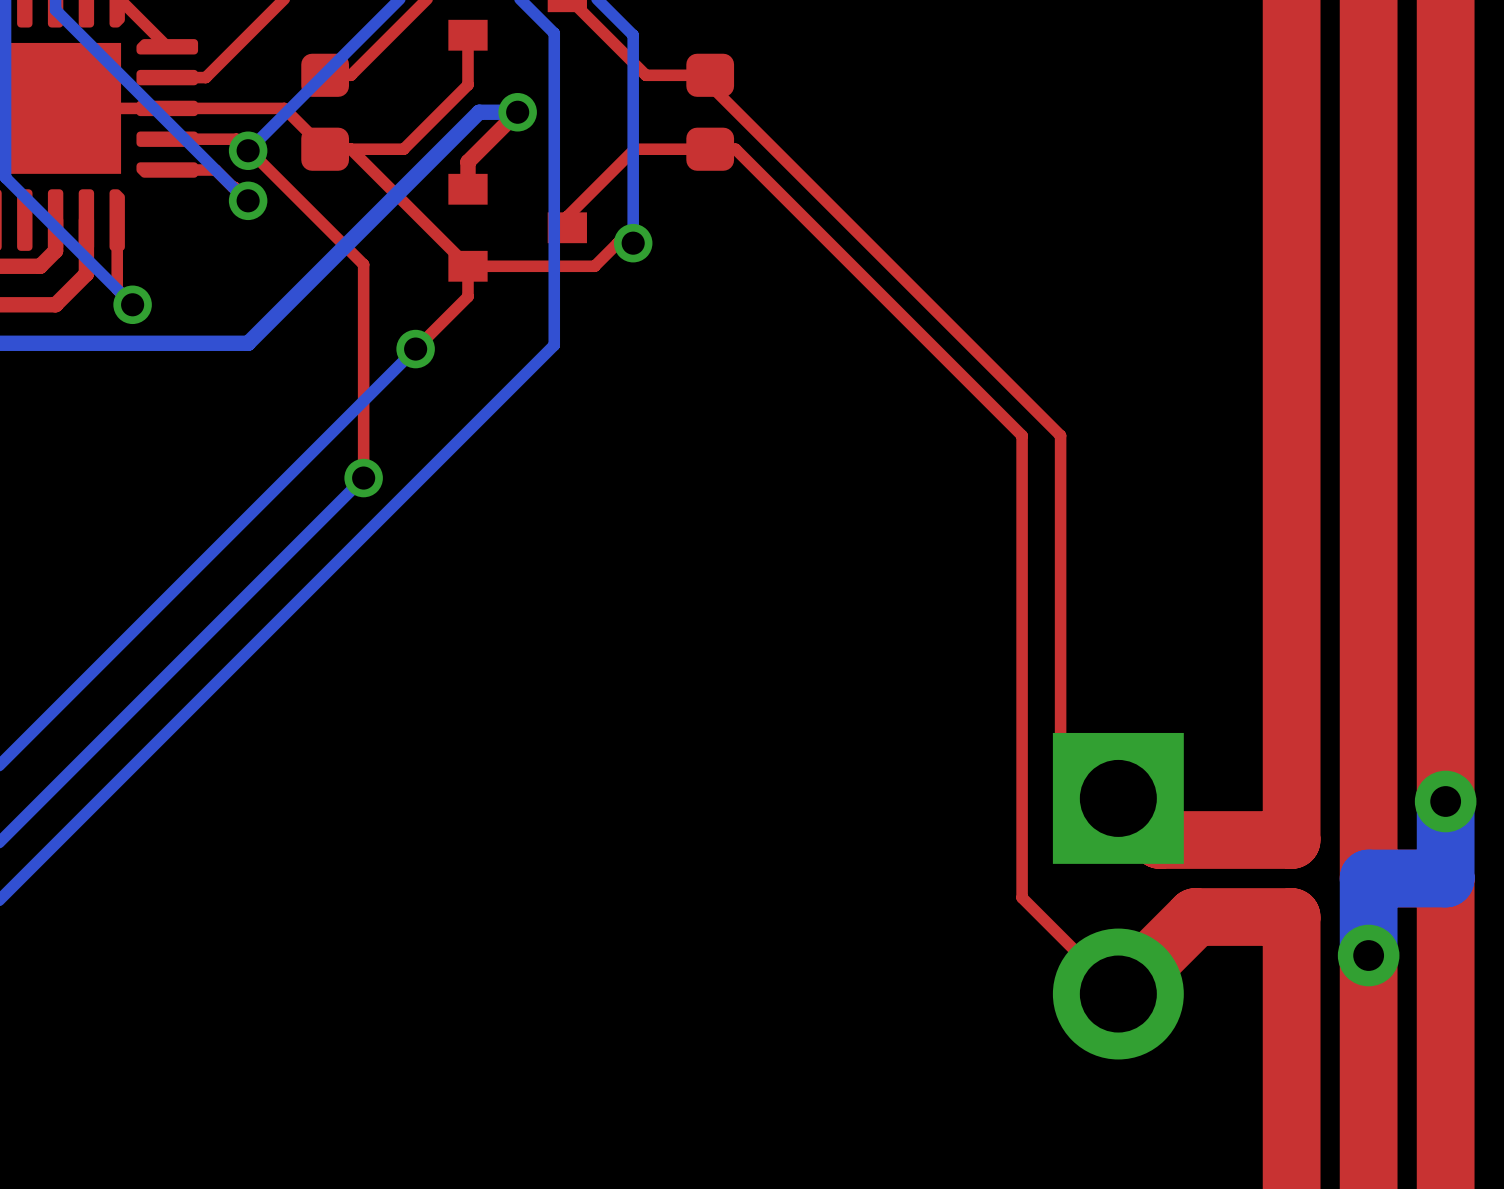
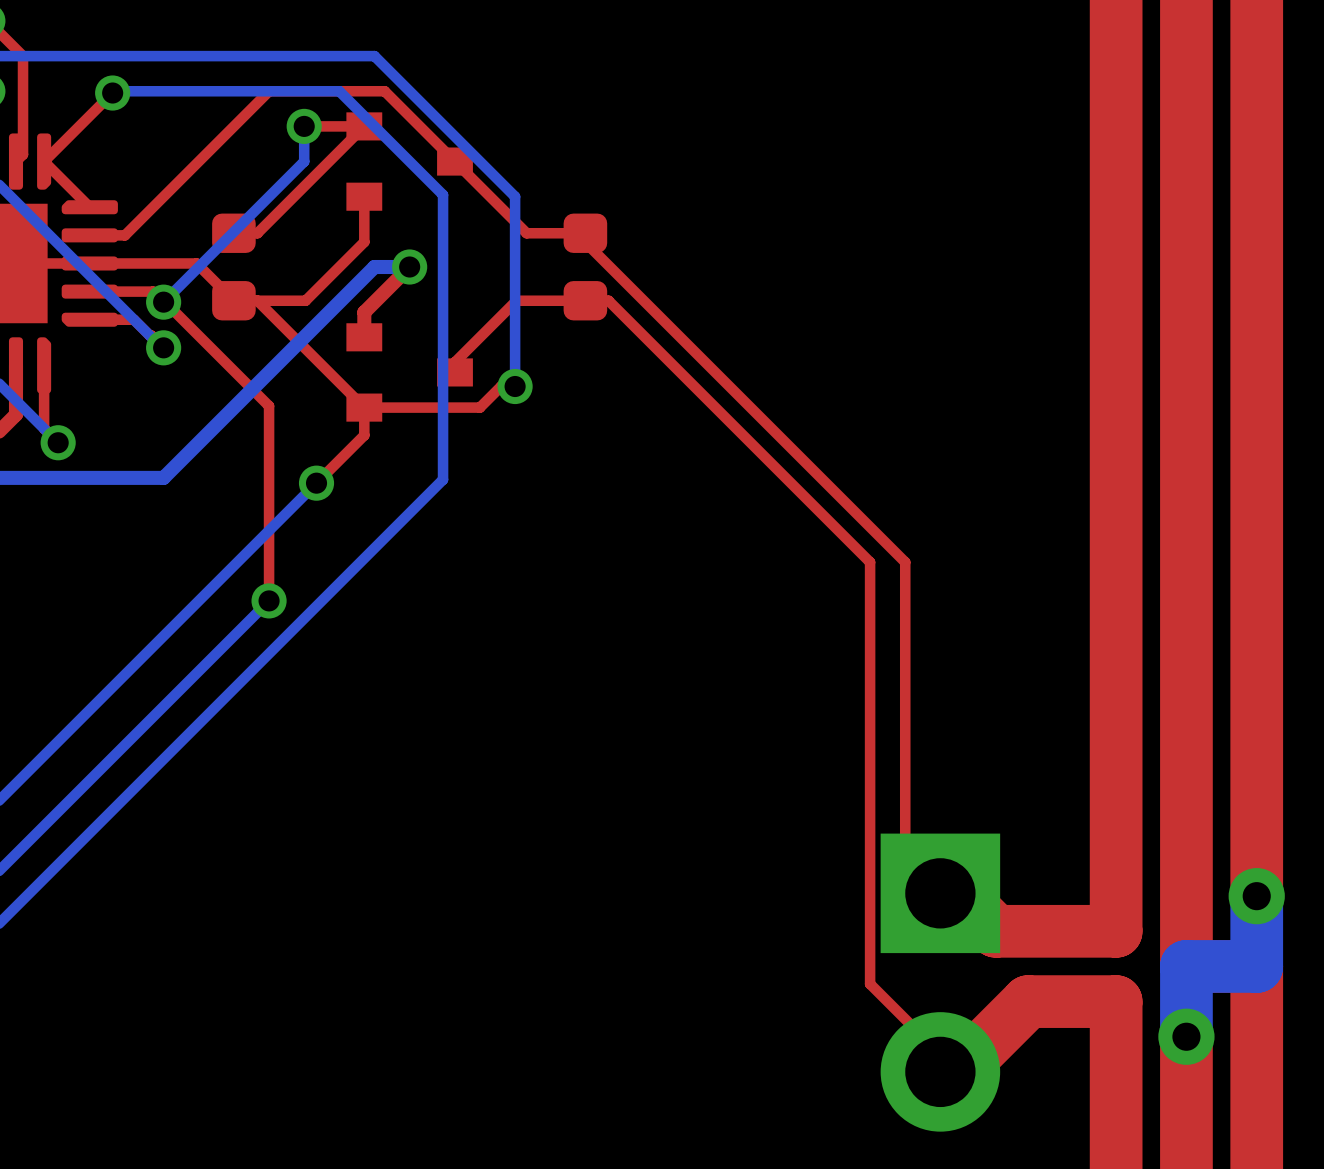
part position: (1118, 896) -> (940, 982)

